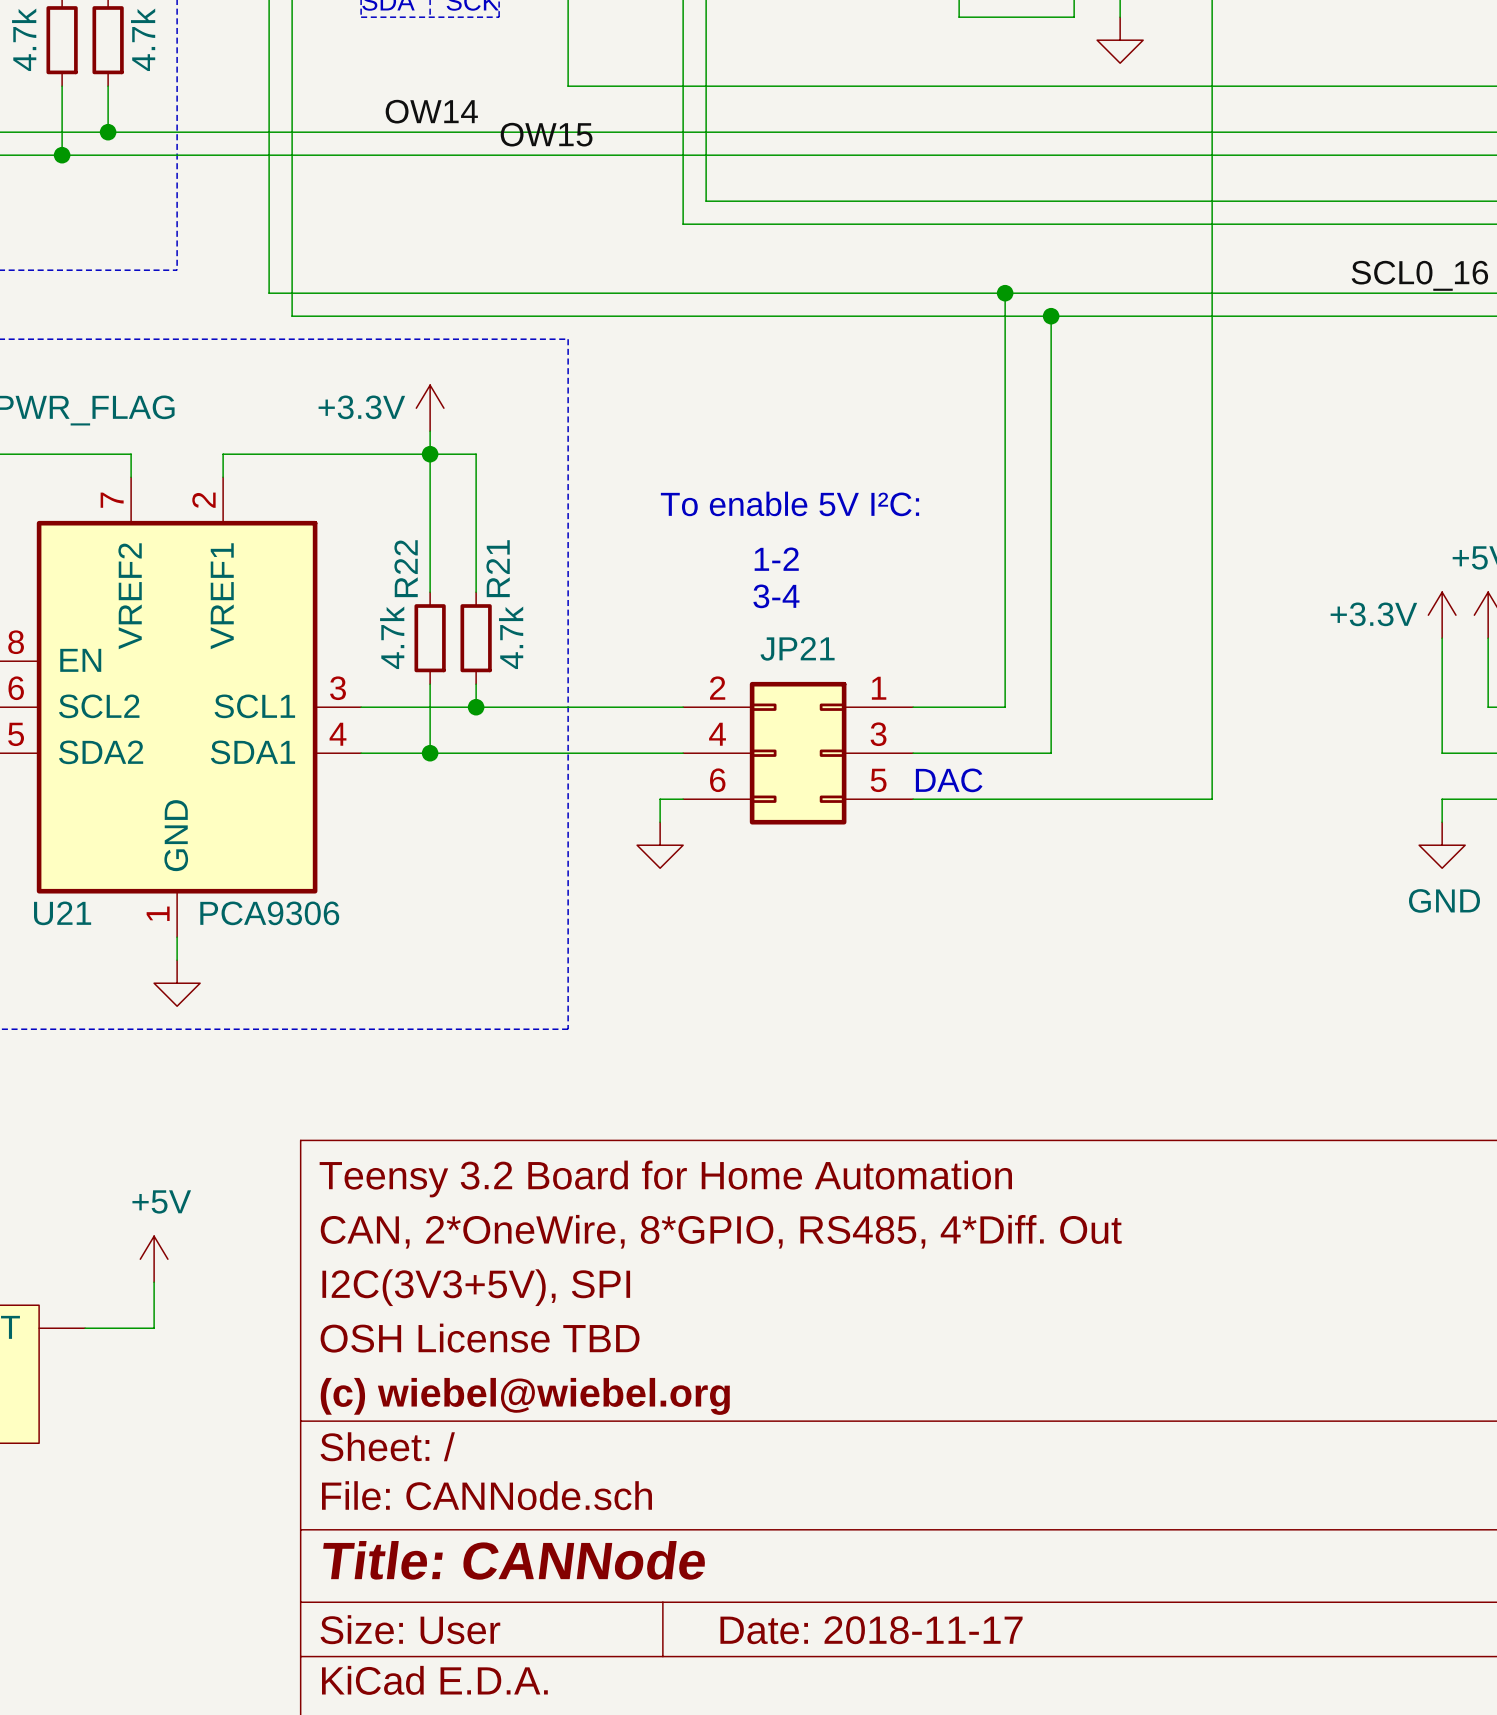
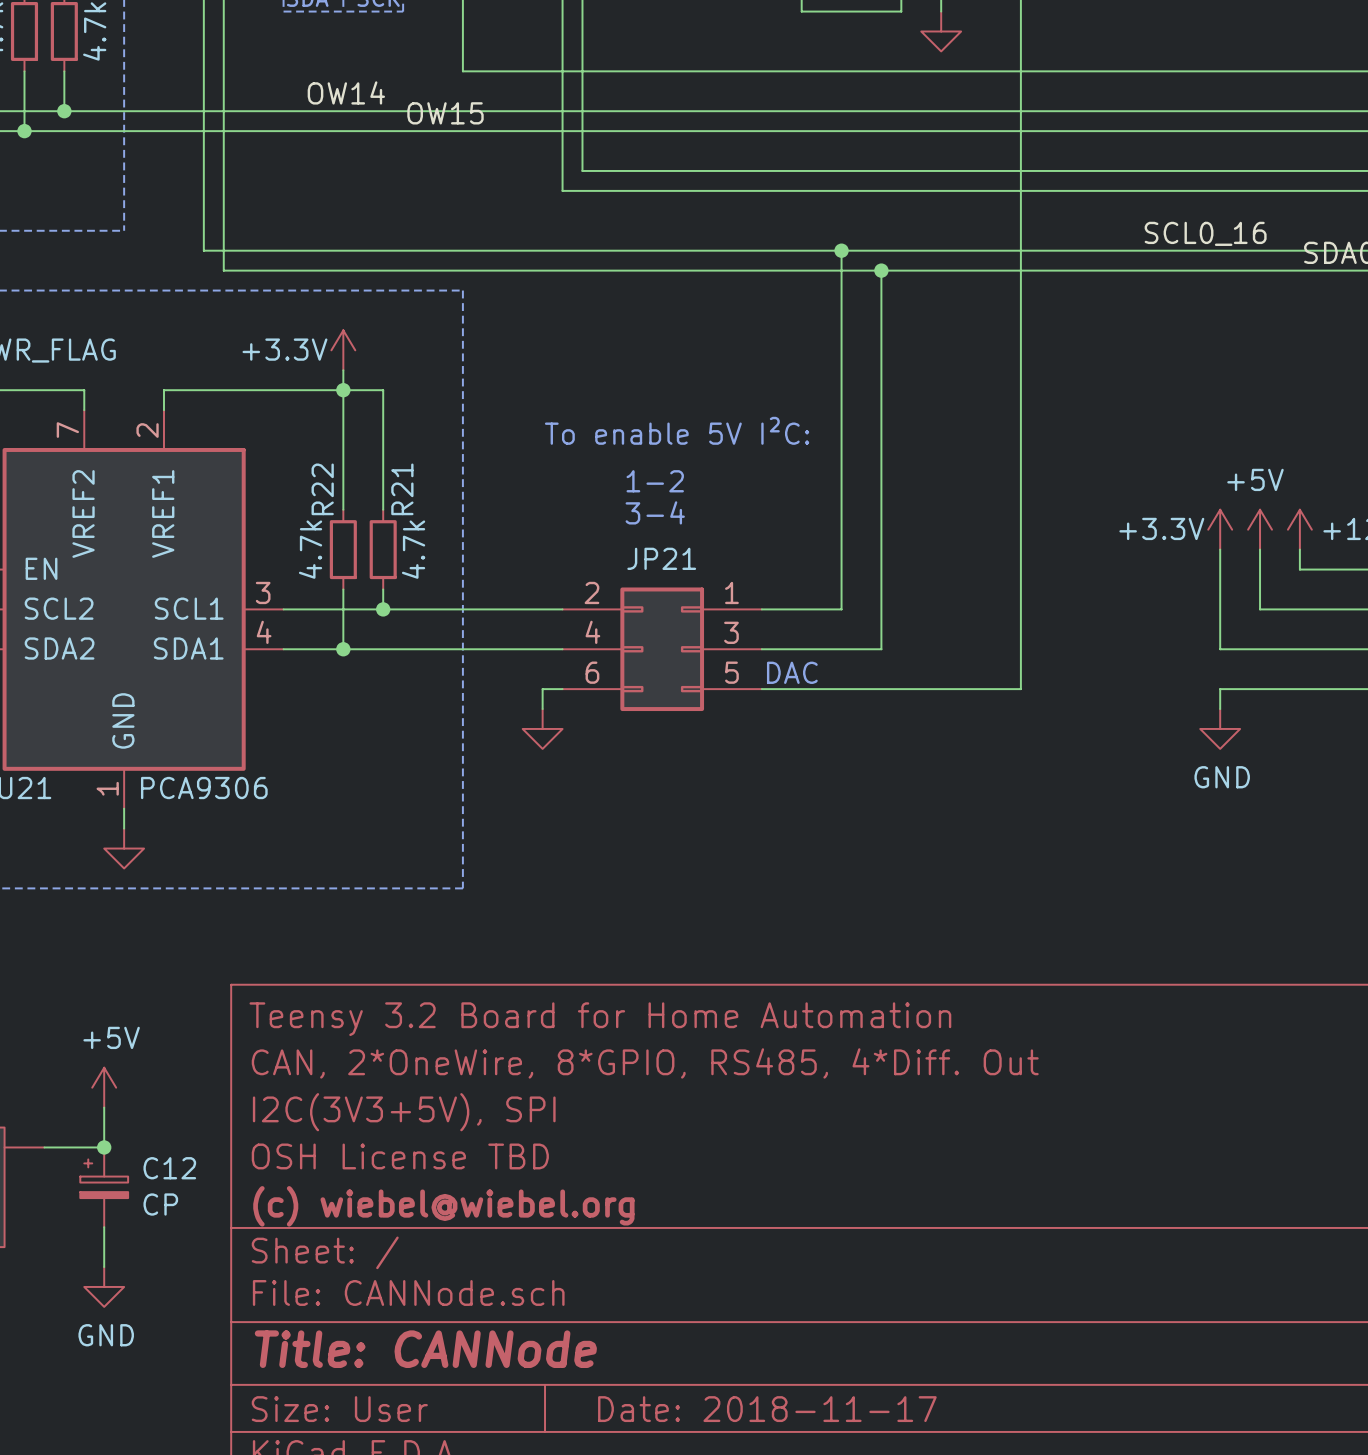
junction: none -> (104, 1147)
C12: none -> CP (104, 1187)
wire: none -> (104, 1227) (104, 1267)
power symbol: none -> GND (104, 1286)

